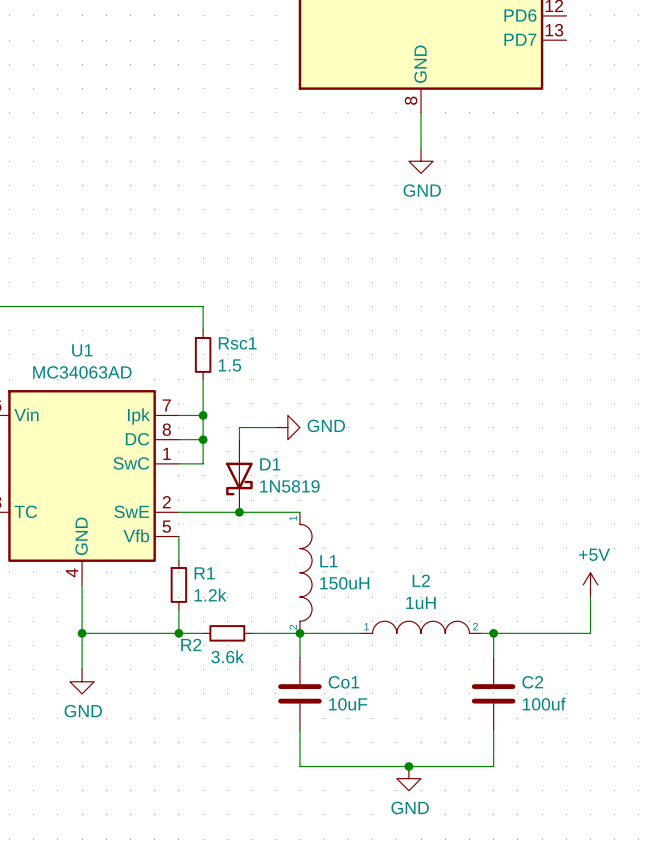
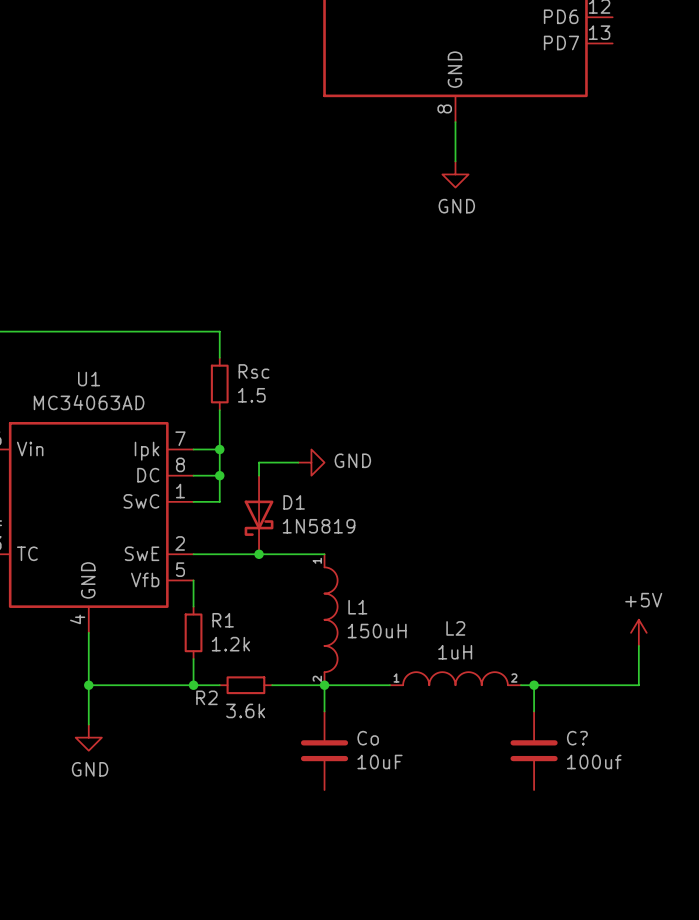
Rsc1 name: Rsc1 (237, 343) -> Rsc (254, 371)
Co1 name: Co1 (343, 682) -> Co (368, 738)
C2 name: C2 (532, 682) -> C? (577, 738)
wire: (299, 730) (299, 766) (493, 766) (493, 730) -> none
junction: (408, 766) -> none
power symbol: GND (408, 778) -> none

